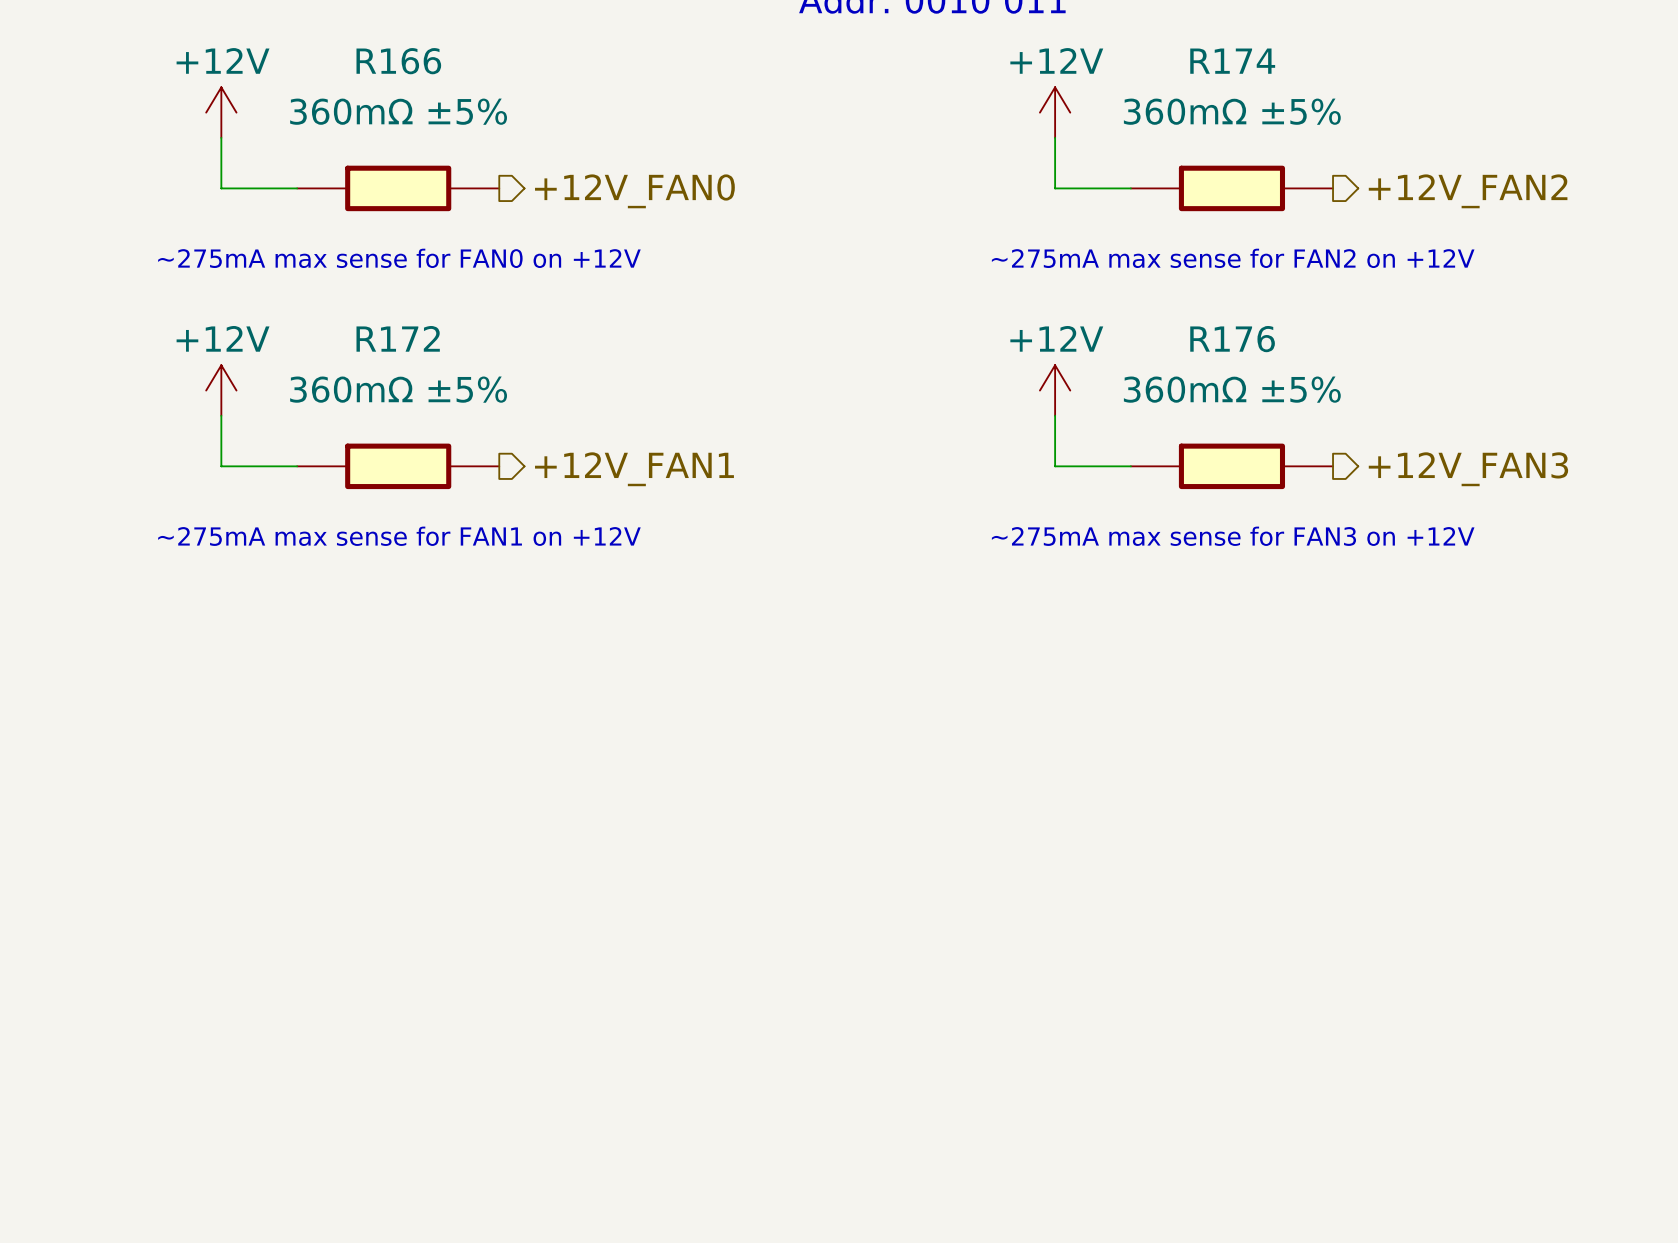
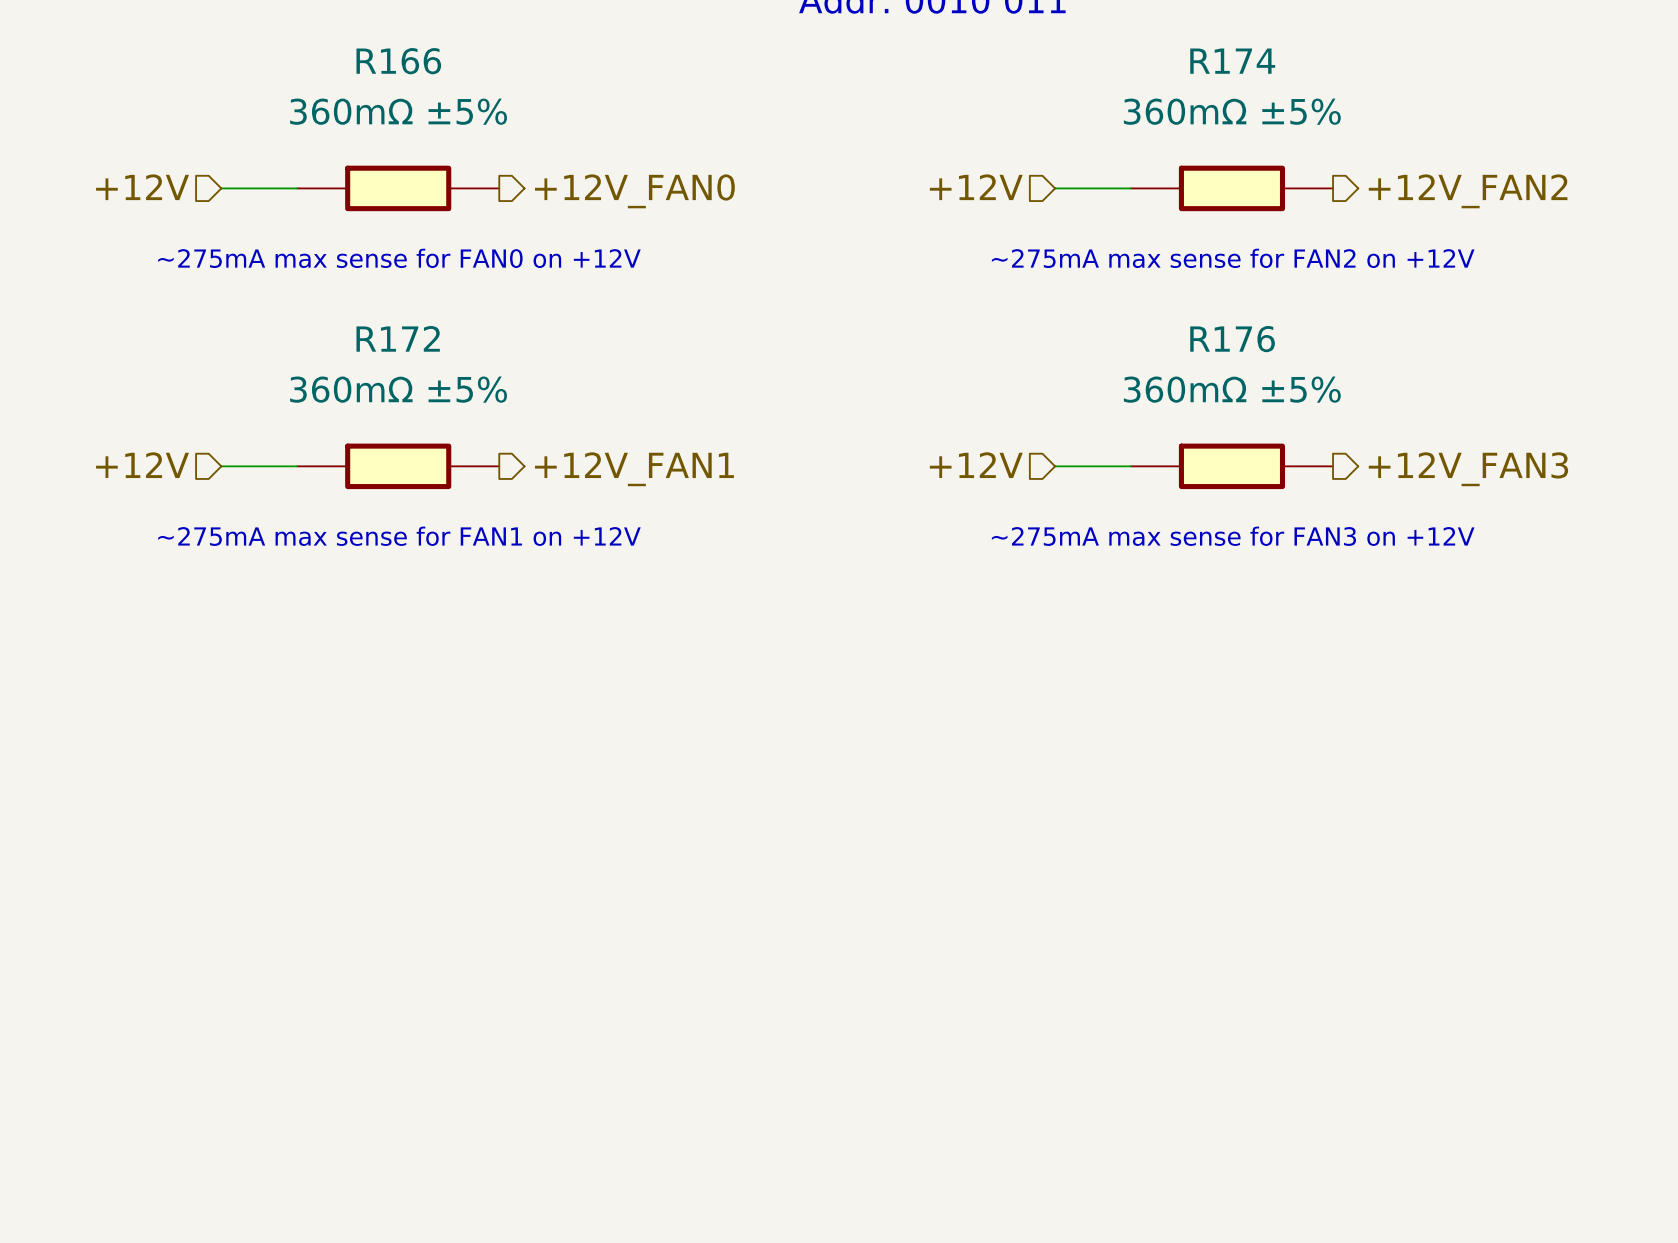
power symbol: +12V (221, 112) -> none
power symbol: +12V (1055, 112) -> none
wire: (221, 137) (221, 188) -> none
wire: (1055, 137) (1055, 188) -> none
hierarchical label: none -> +12V (142, 187)
hierarchical label: none -> +12V (976, 187)
power symbol: +12V (221, 390) -> none
power symbol: +12V (1055, 390) -> none
wire: (221, 415) (221, 466) -> none
wire: (1055, 415) (1055, 466) -> none
hierarchical label: none -> +12V (142, 465)
hierarchical label: none -> +12V (976, 465)

